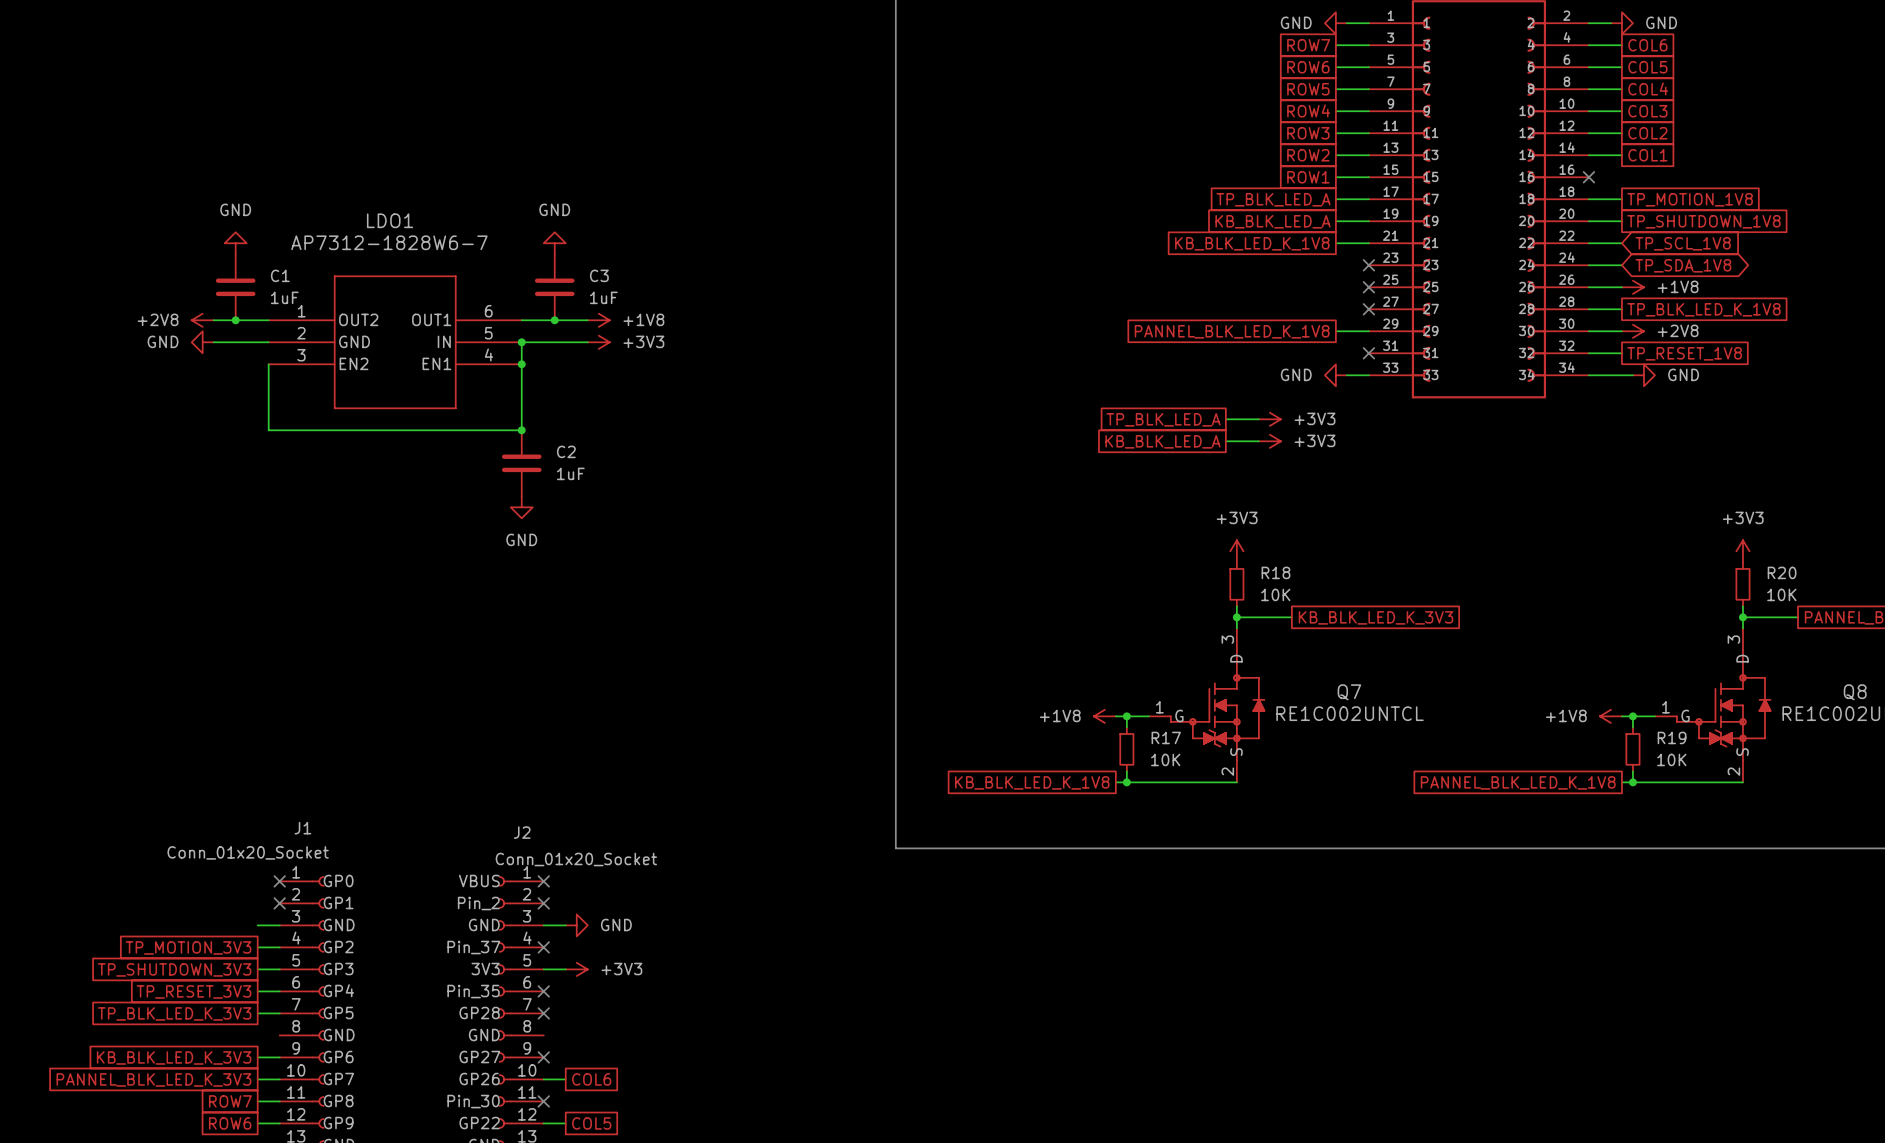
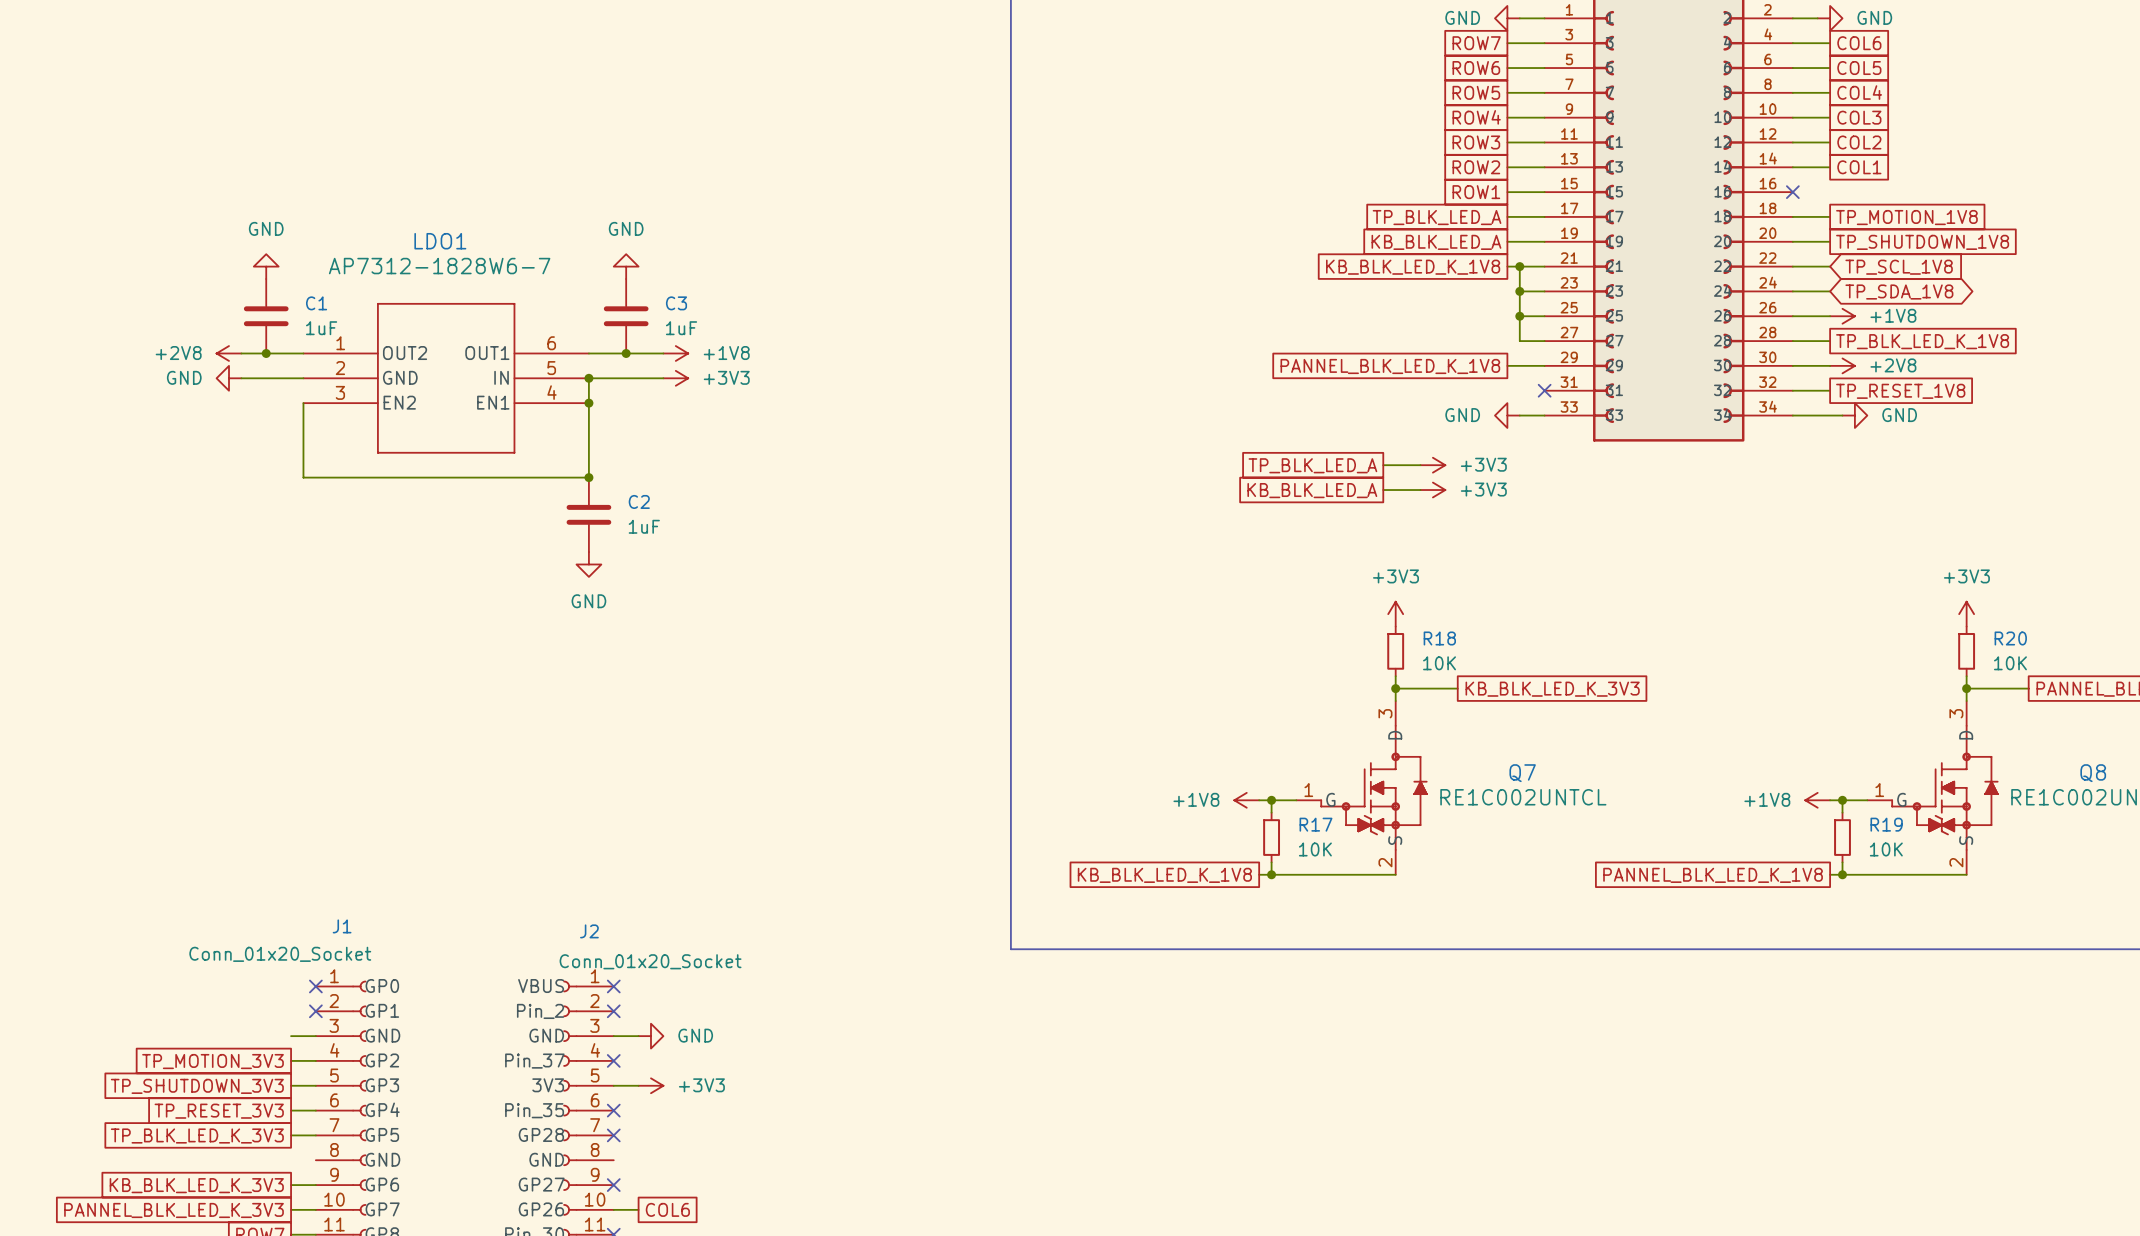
wire: none -> (1519, 266) (1519, 341) (1544, 341)
junction: none -> (1519, 266)
wire: none -> (1519, 291) (1544, 291)
junction: none -> (1519, 291)
no-connect mark: (1368, 265) -> none
wire: none -> (1519, 316) (1544, 316)
junction: none -> (1519, 316)
no-connect mark: (1368, 287) -> none
no-connect mark: (1368, 309) -> none

